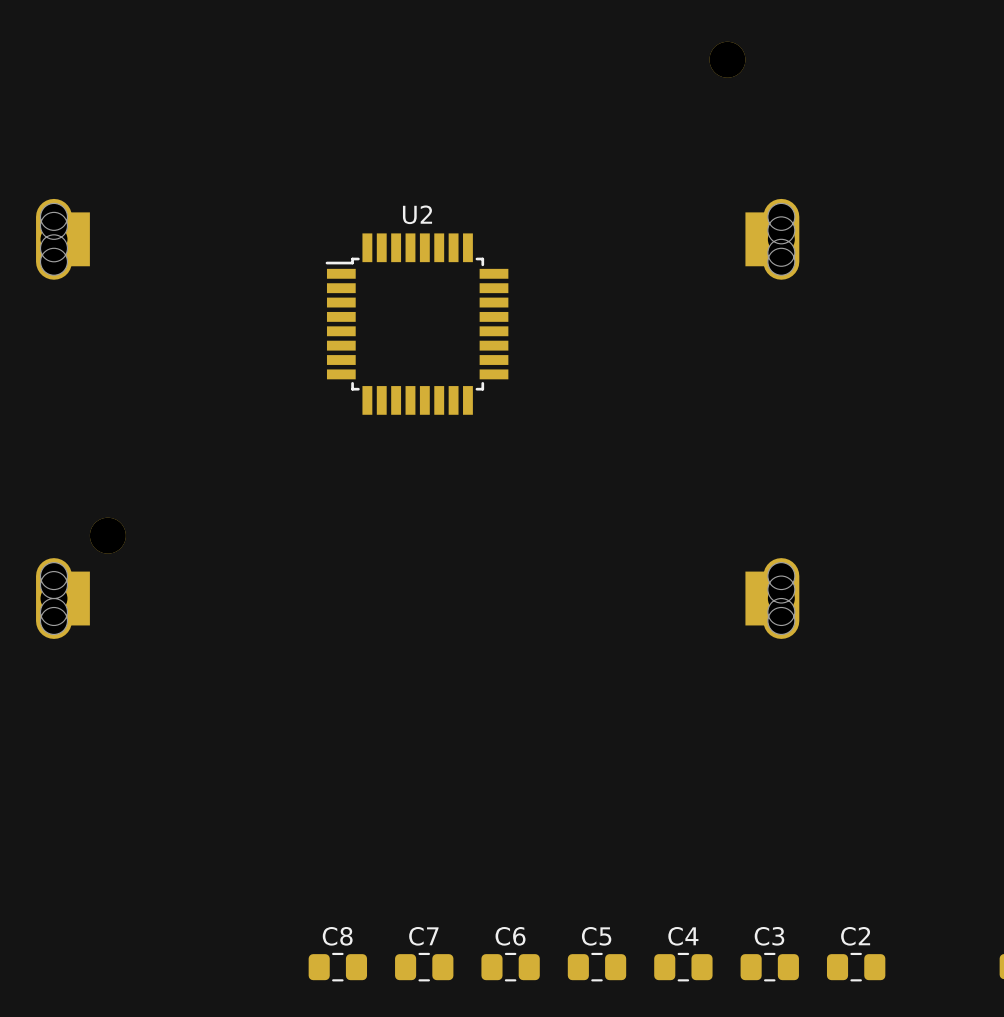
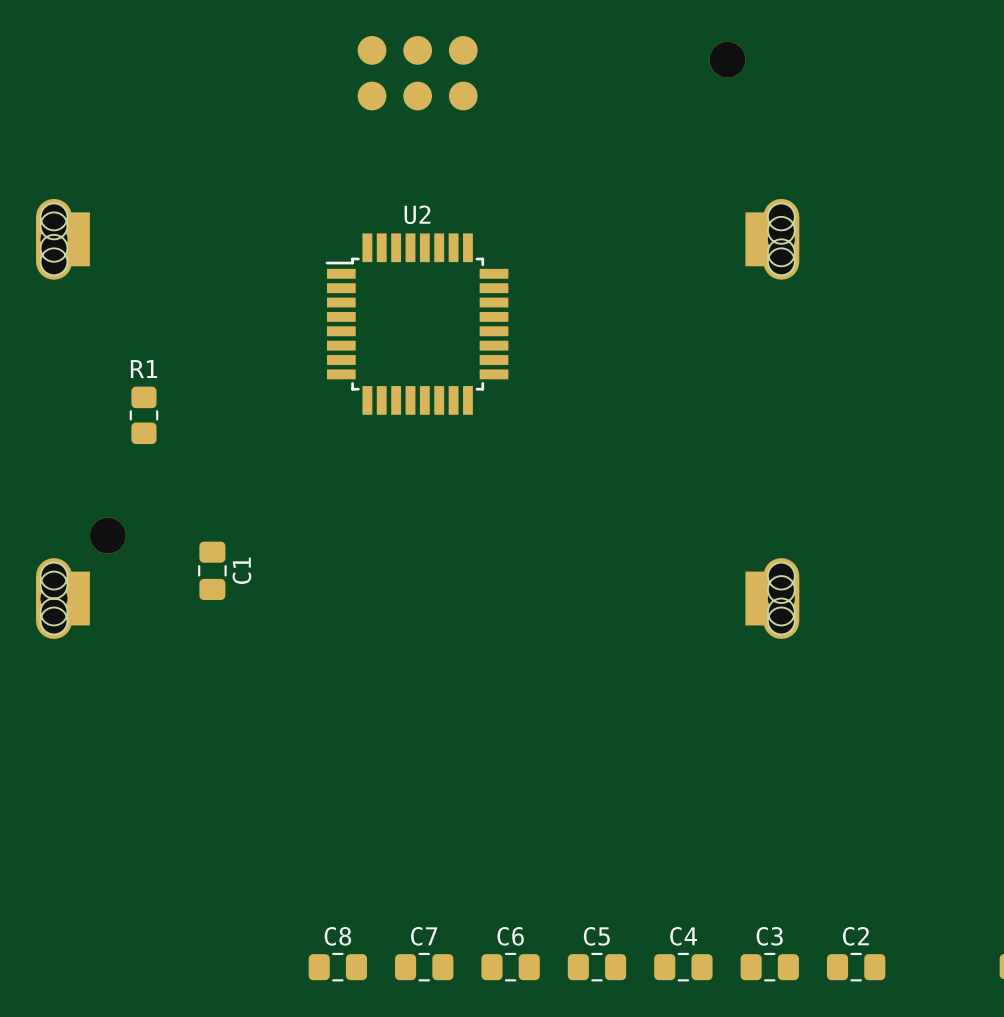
part: none -> (417, 73)
R1: none -> (143, 415)
C1: none -> (212, 570)

